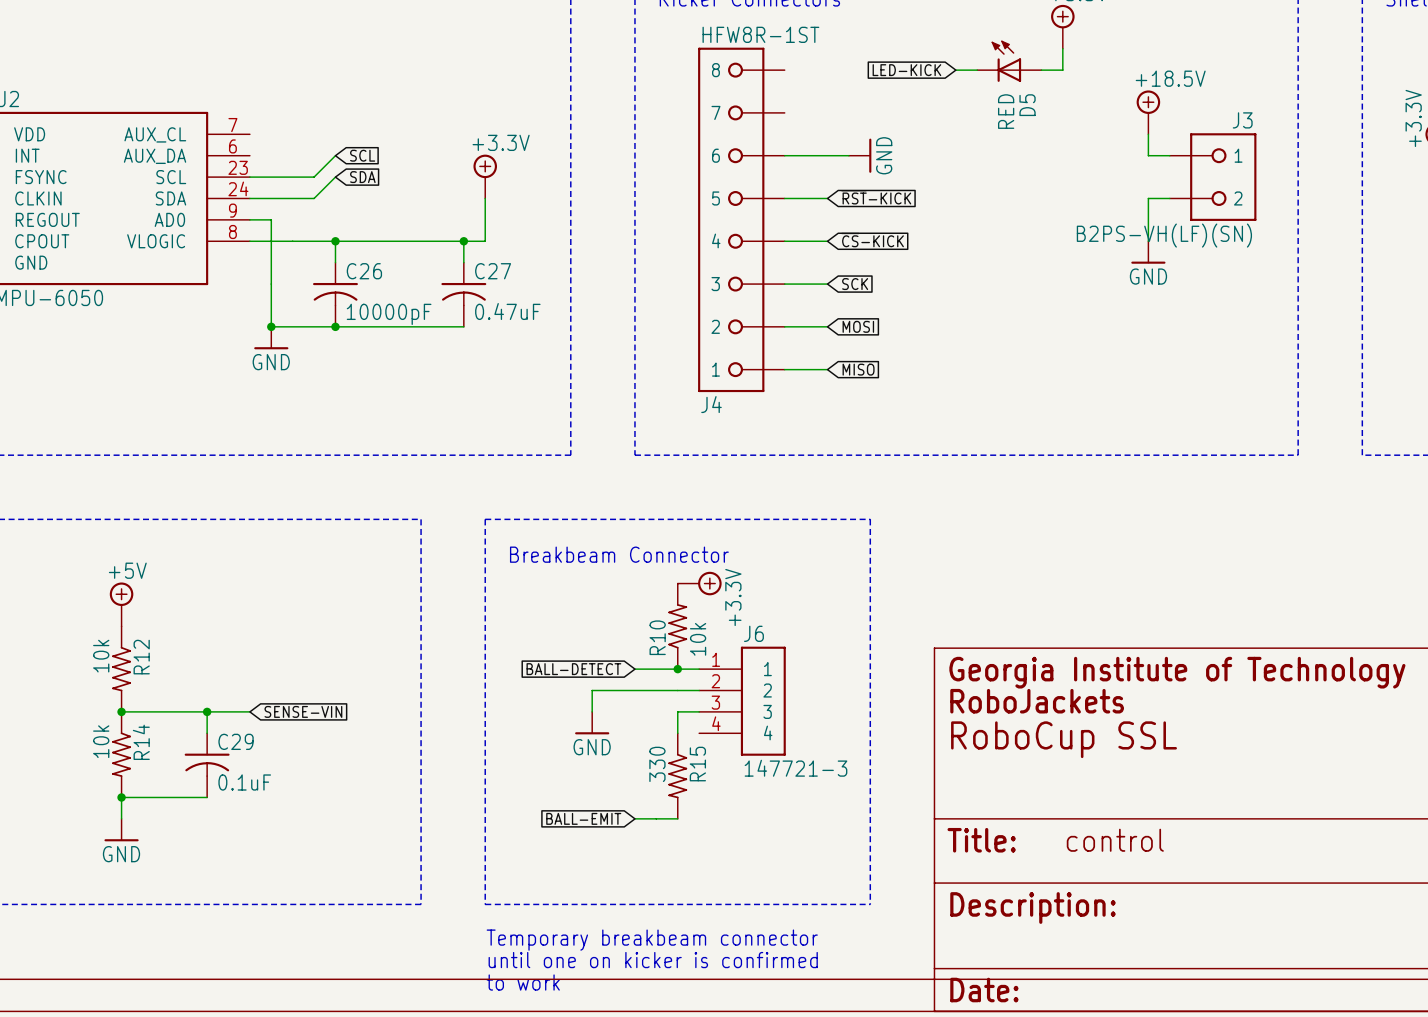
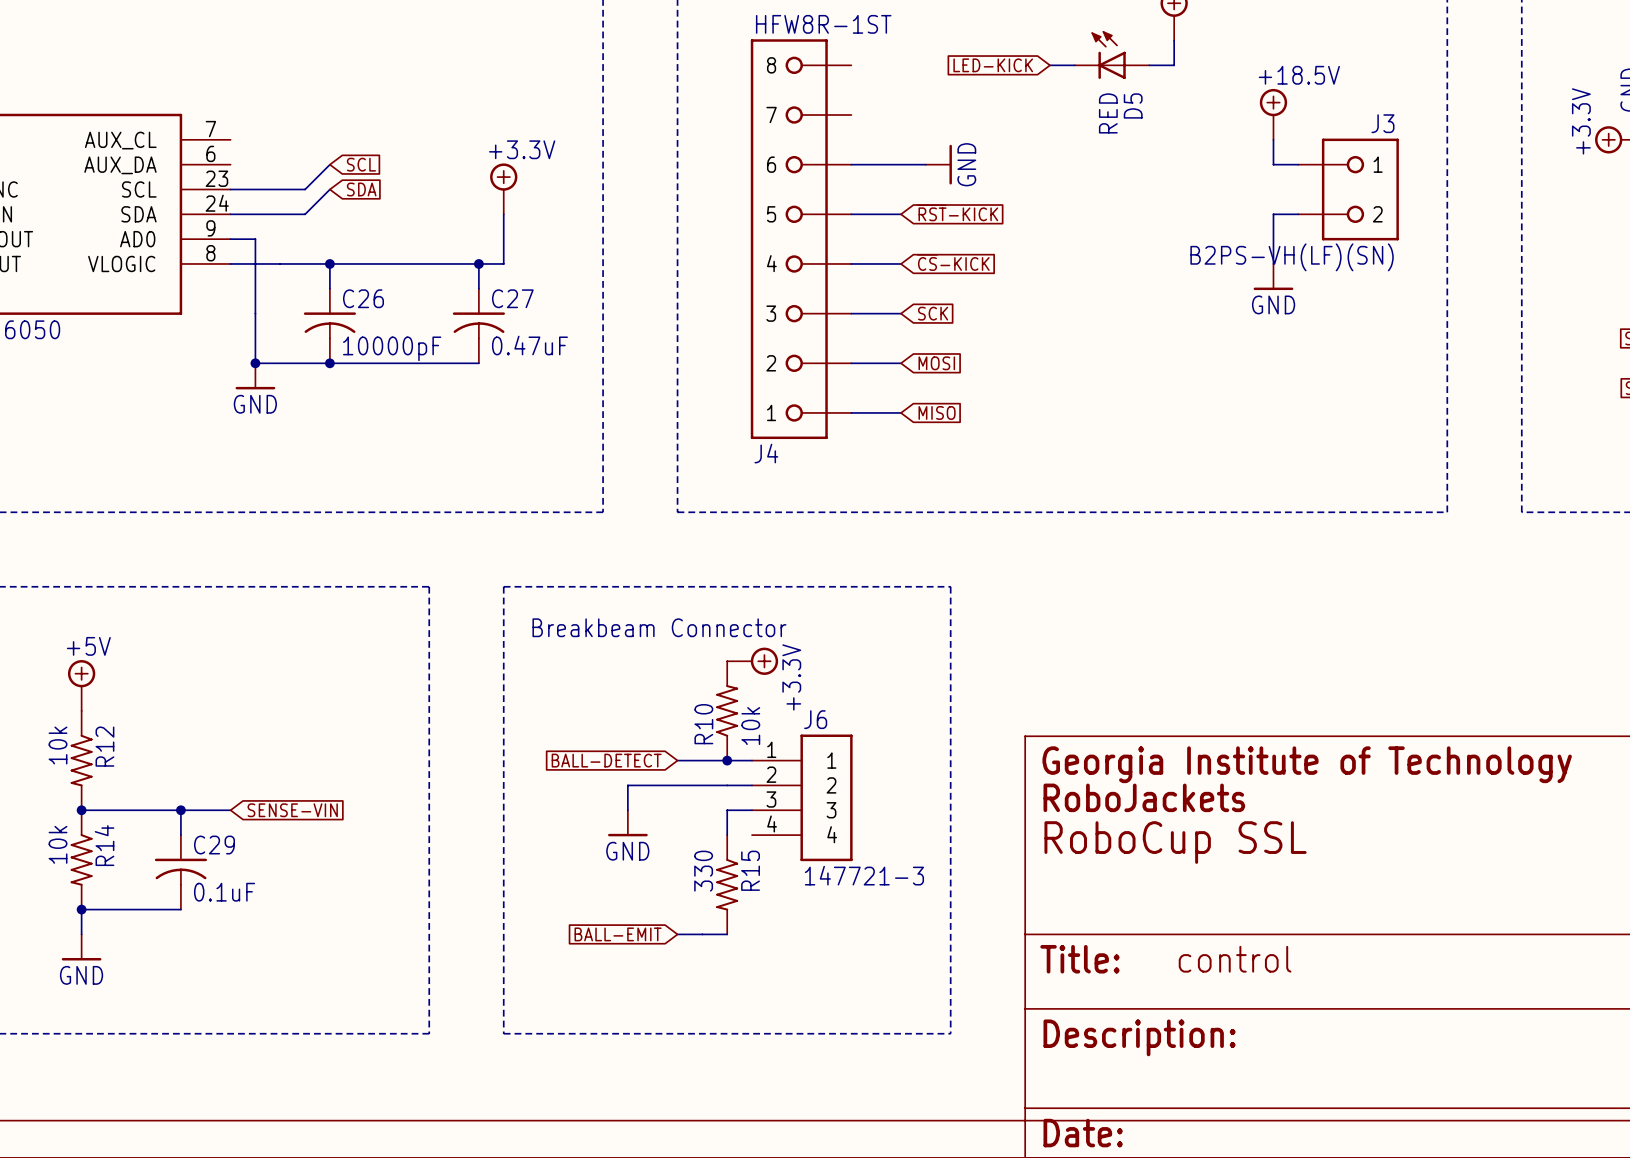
text: Temporary breakbeam connector (652, 940) -> none
text: until one on kicker is confirmed (653, 960) -> none
text: to work (523, 982) -> none

